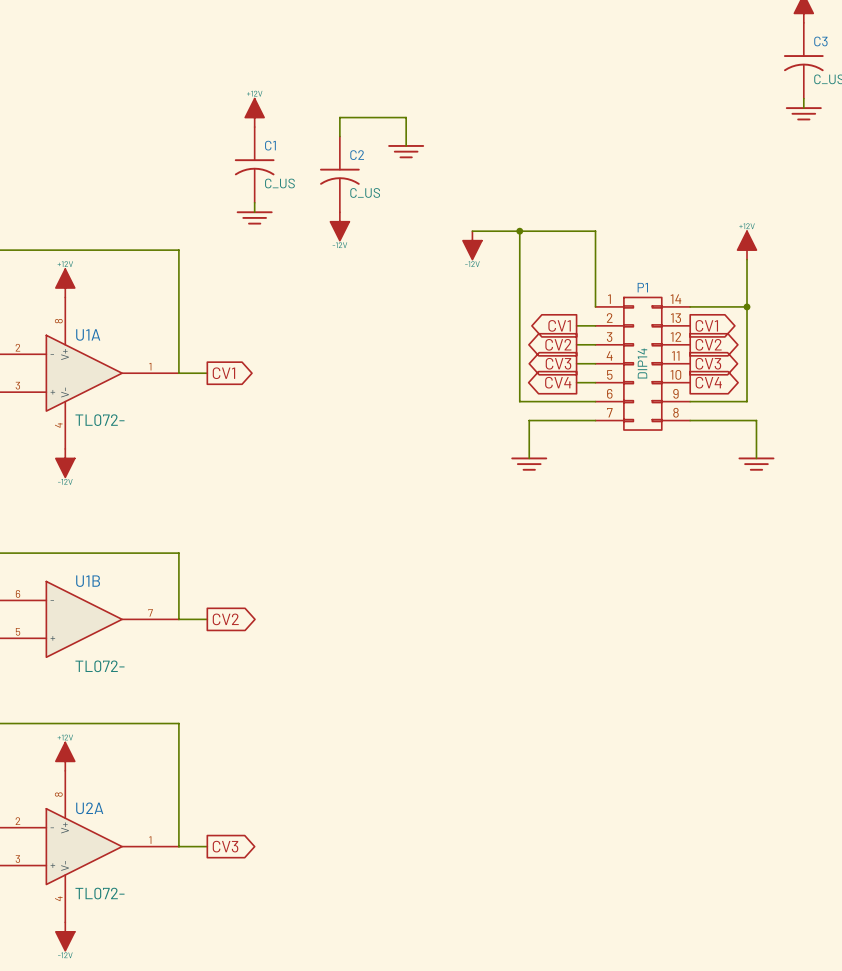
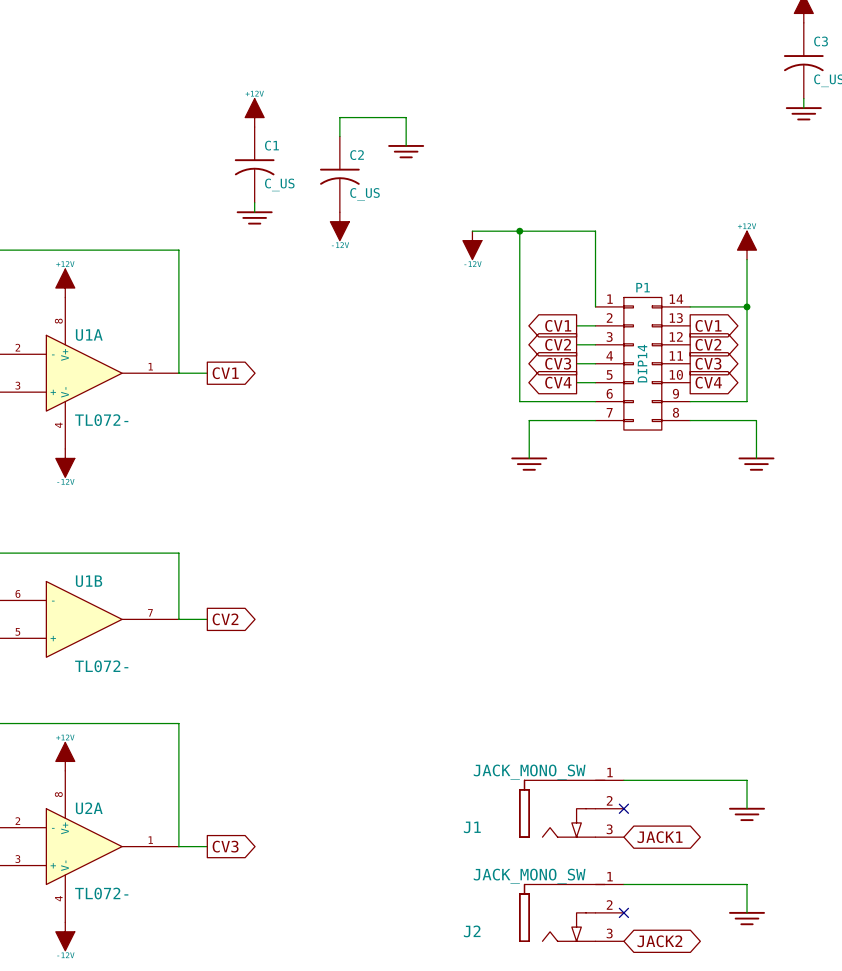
wire: none -> (623, 780) (747, 780) (747, 808)
J1: none -> JACK_MONO_SW (571, 808)
no-connect mark: none -> (623, 808)
power symbol: none -> (747, 814)
global label: none -> JACK1 (660, 837)
wire: none -> (623, 884) (747, 884) (747, 912)
J2: none -> JACK_MONO_SW (571, 912)
no-connect mark: none -> (623, 912)
power symbol: none -> (747, 918)
global label: none -> JACK2 (659, 941)

